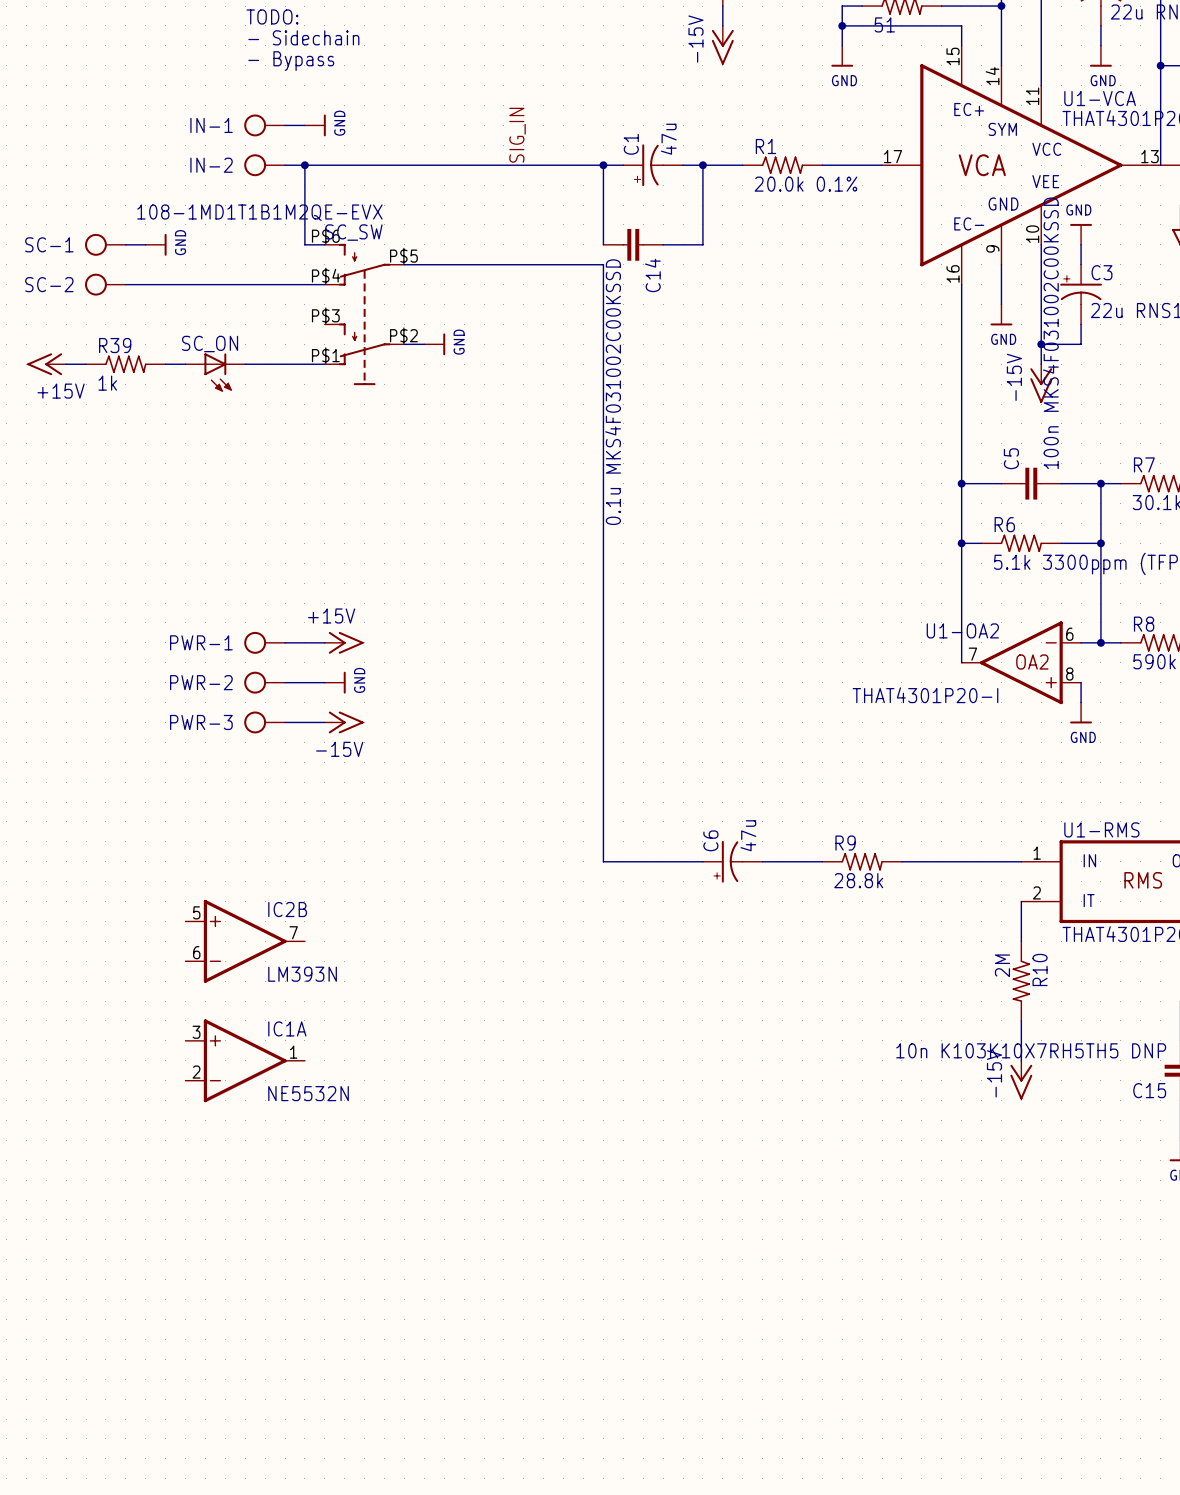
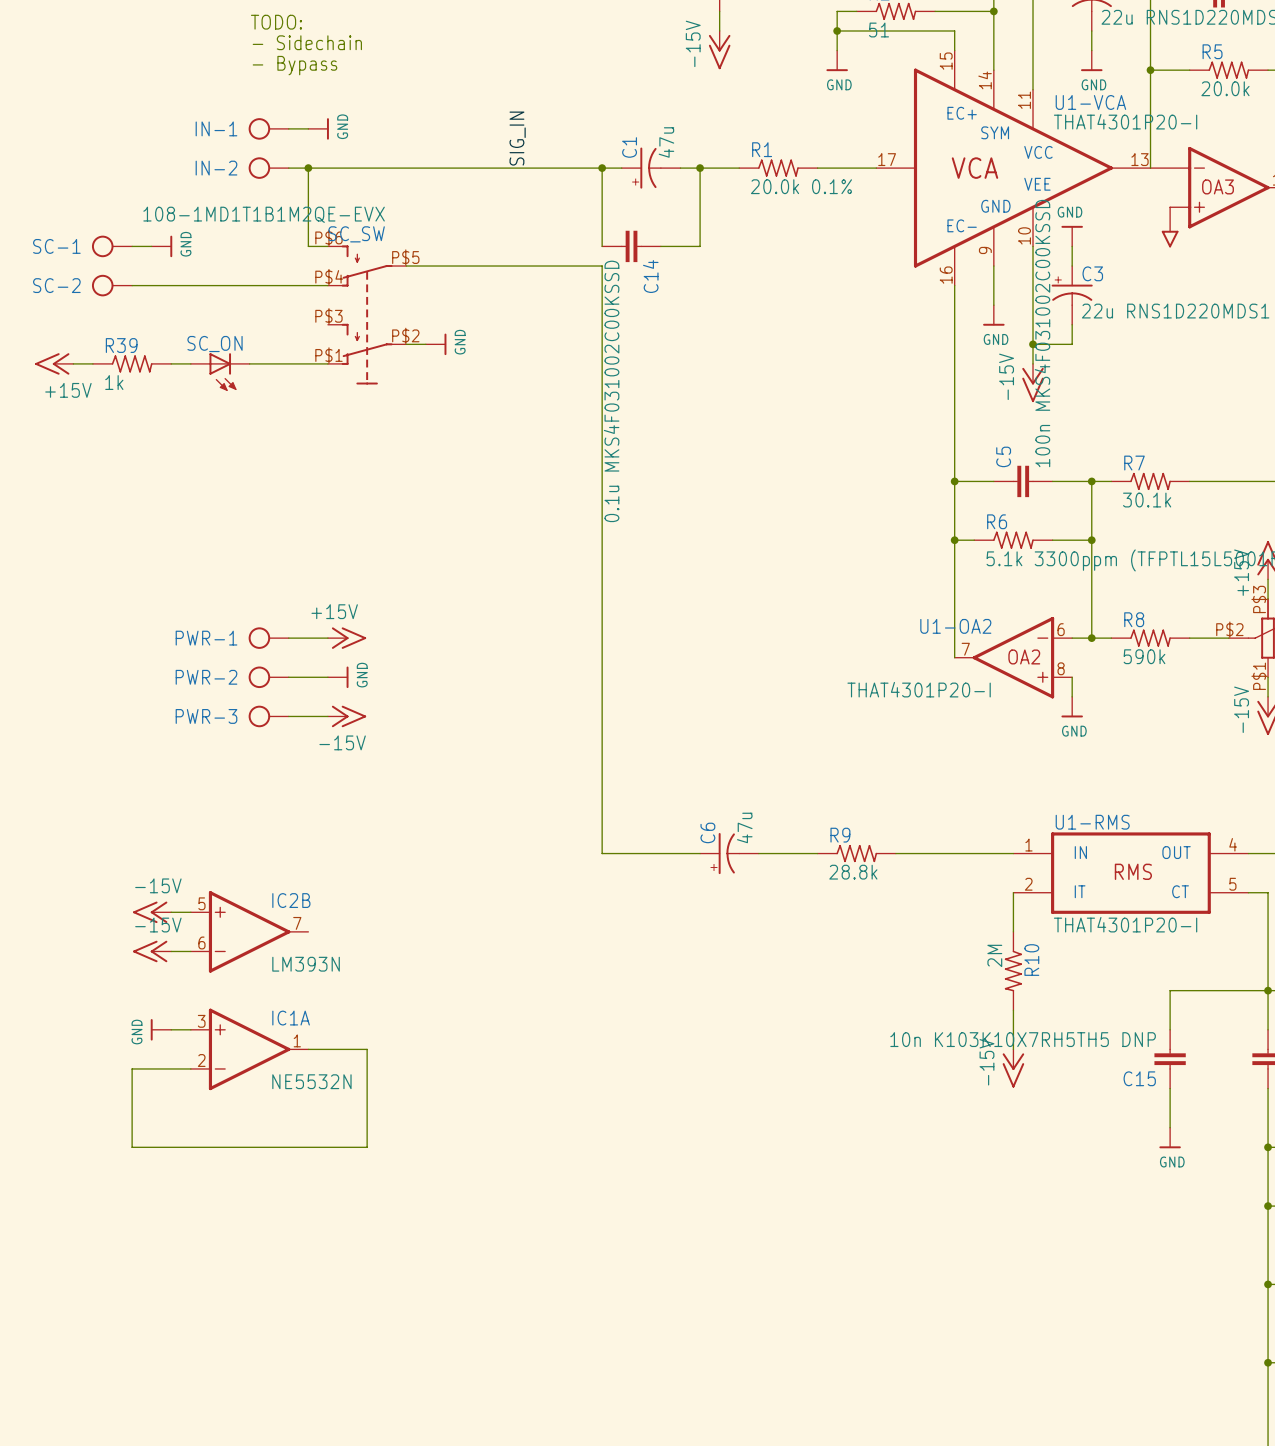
power symbol: none -> -15V (152, 912)
wire: none -> (171, 912) (190, 912)
power symbol: none -> -15V (152, 951)
wire: none -> (171, 951) (190, 951)
power symbol: none -> GND (161, 1029)
wire: none -> (171, 1029) (190, 1029)
wire: none -> (308, 1049) (367, 1049) (367, 1147) (132, 1147) (132, 1068) (190, 1068)

